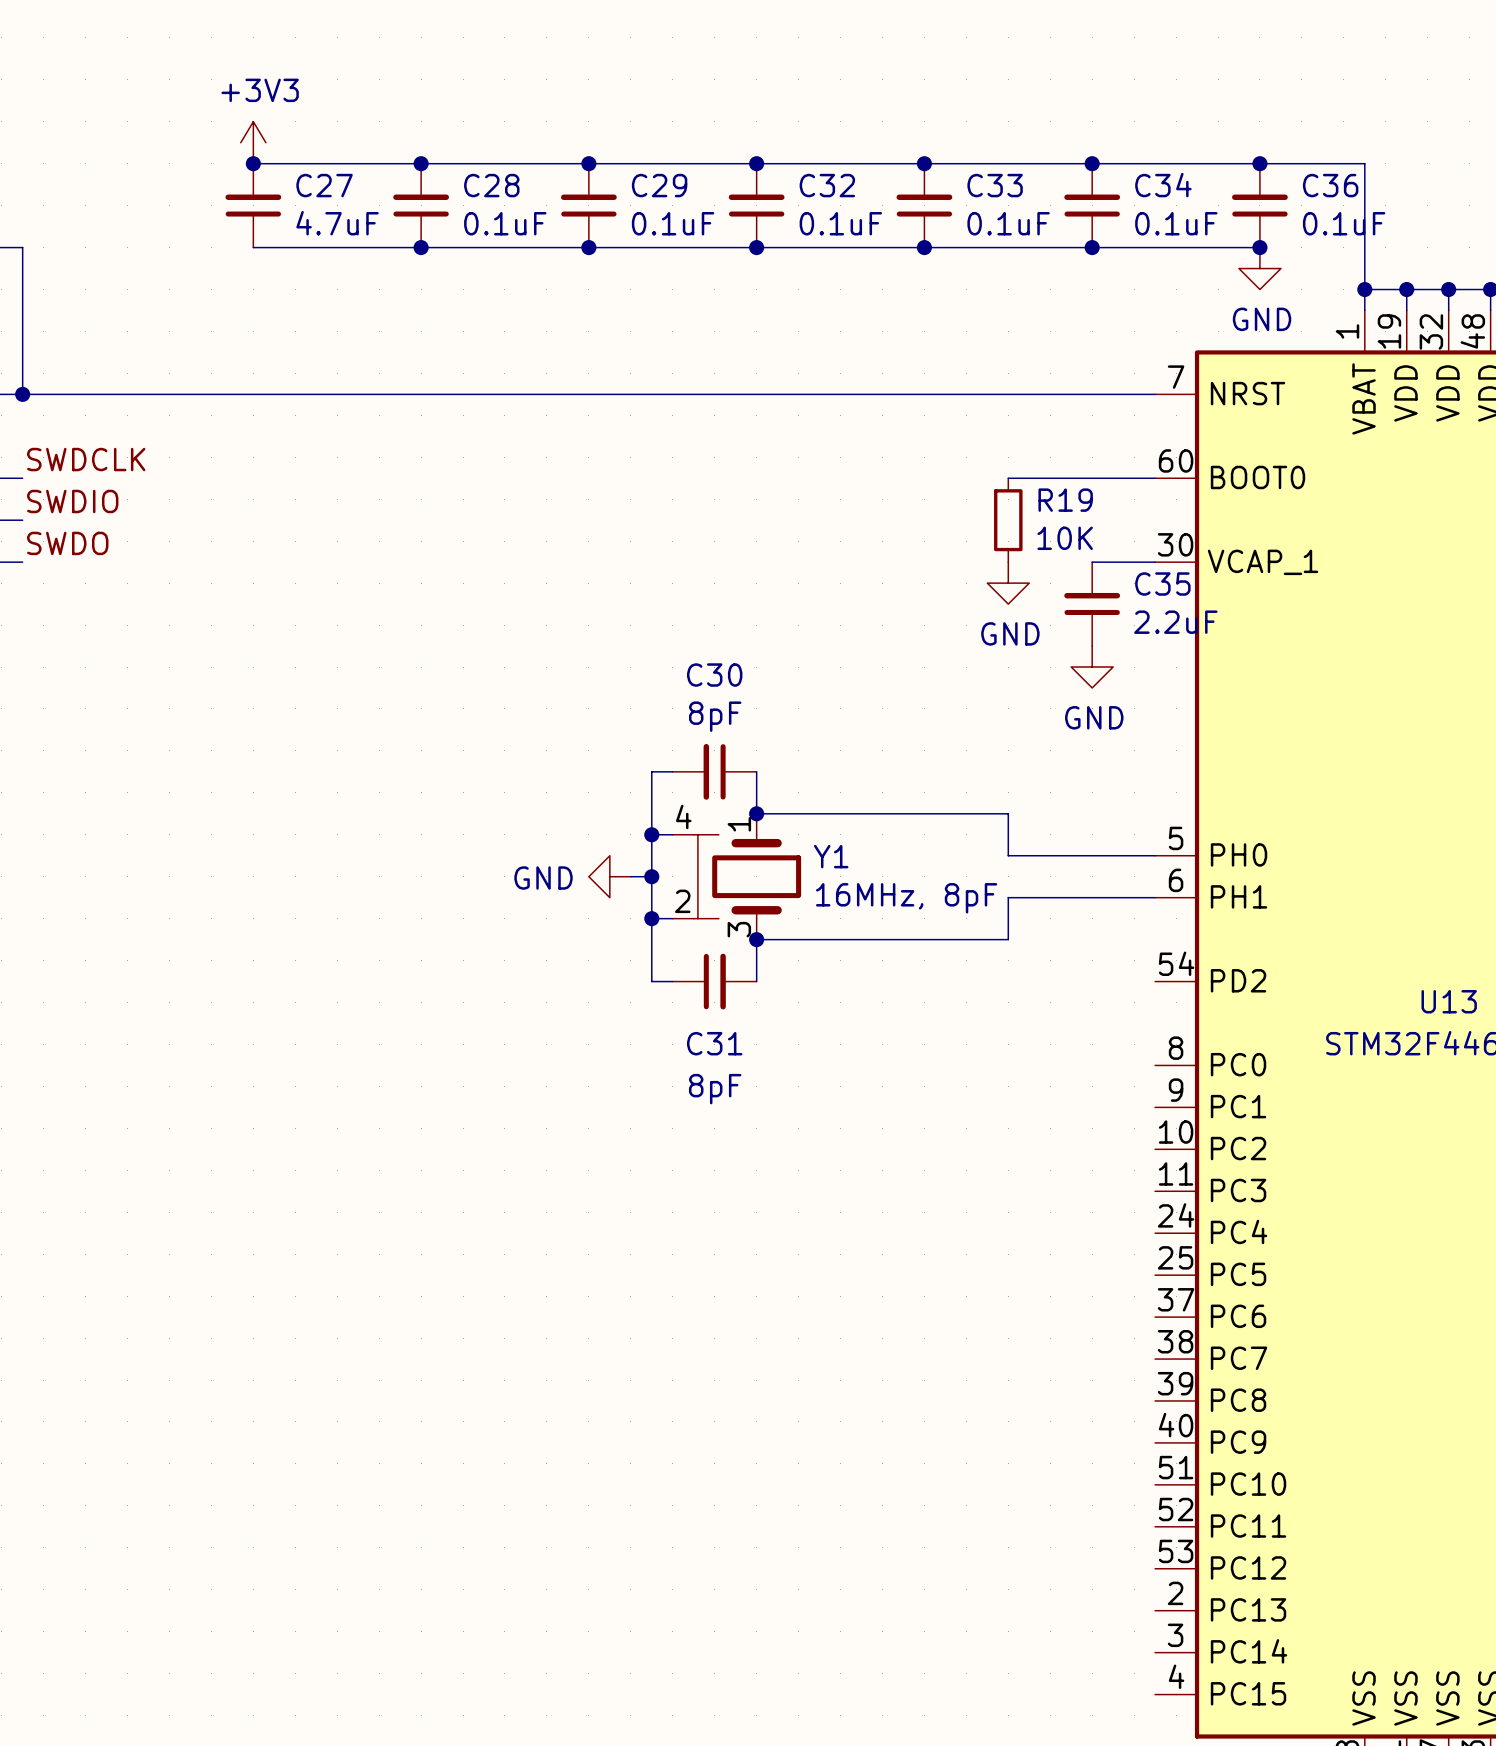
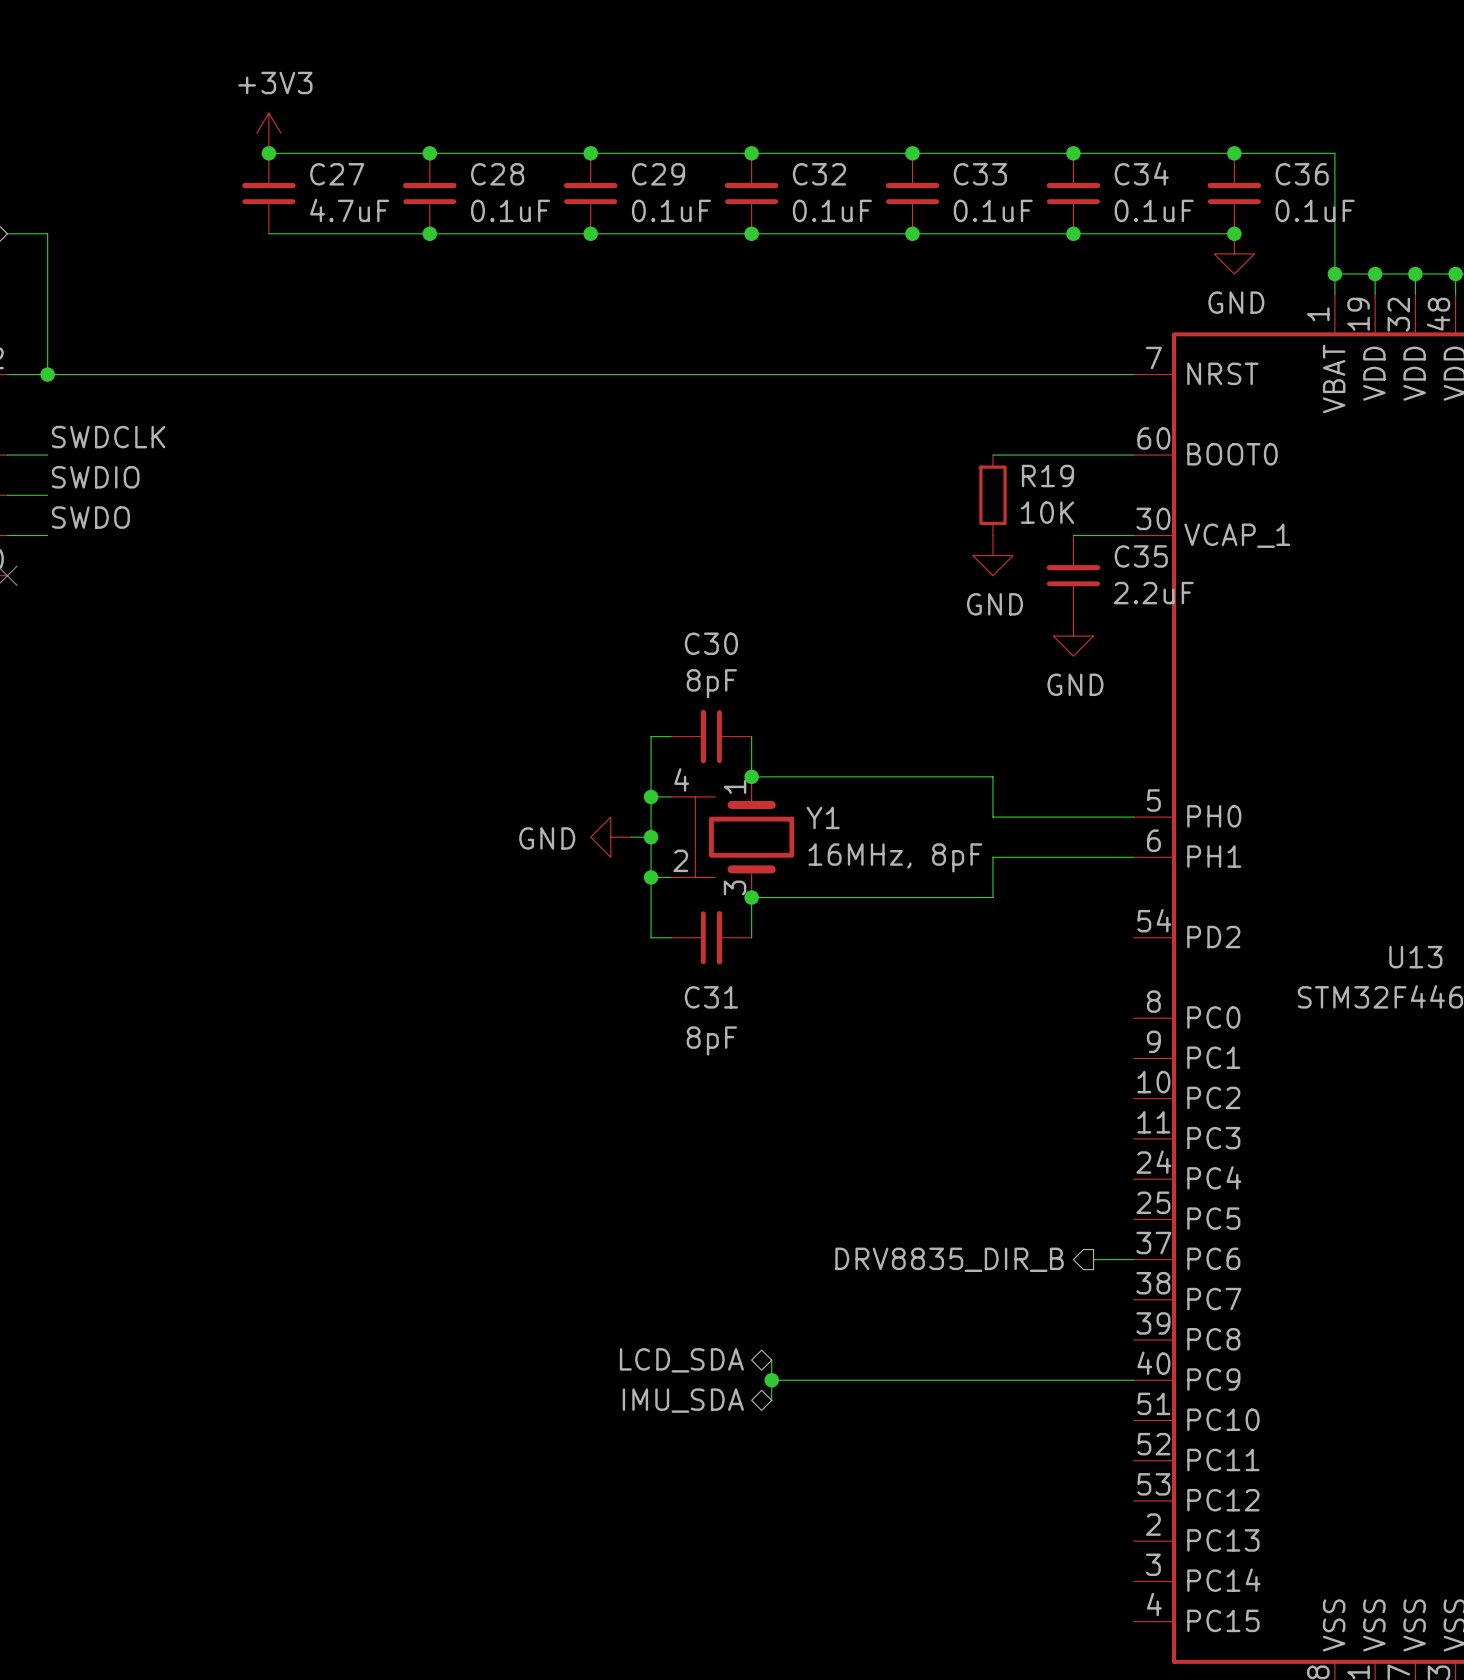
hierarchical label: none -> DRV8835_DIR_B (949, 1259)
wire: none -> (1093, 1259) (1133, 1259)
wire: none -> (771, 1360) (771, 1400)
hierarchical label: none -> LCD_SDA (681, 1360)
wire: none -> (771, 1380) (1133, 1380)
junction: none -> (771, 1380)
hierarchical label: none -> IMU_SDA (683, 1400)

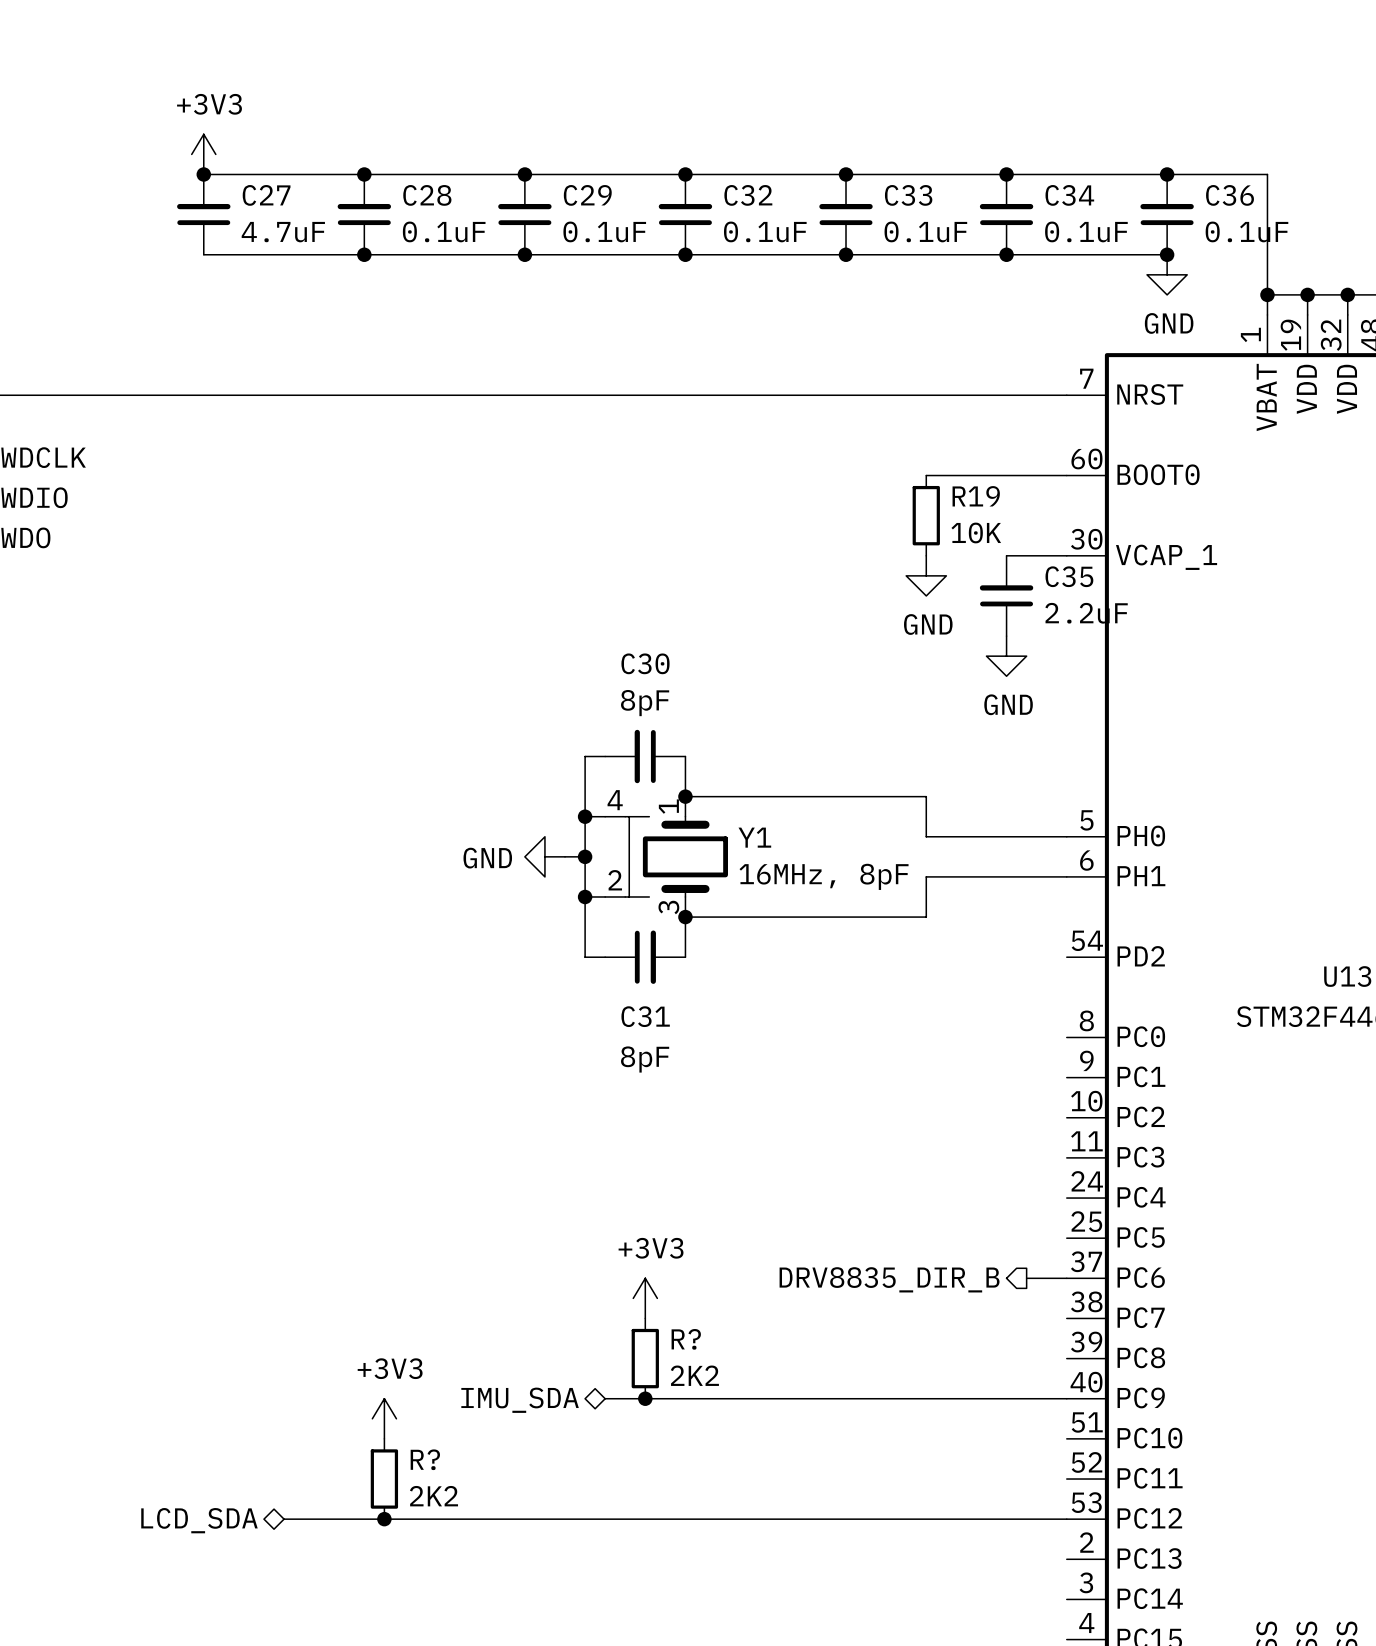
power symbol: none -> +3V3 (645, 1298)
R?: none -> 2K2 (645, 1358)
hierarchical label: LCD_SDA (681, 1360) -> none
wire: (771, 1360) (771, 1400) -> none
wire: none -> (605, 1398) (705, 1398)
junction position: (771, 1380) -> (645, 1398)
power symbol: none -> +3V3 (384, 1418)
hierarchical label position: IMU_SDA (683, 1400) -> IMU_SDA (520, 1400)
R?: none -> 2K2 (384, 1479)
wire: none -> (284, 1519) (1066, 1519)
junction: none -> (384, 1519)
hierarchical label: none -> LCD_SDA (199, 1520)

